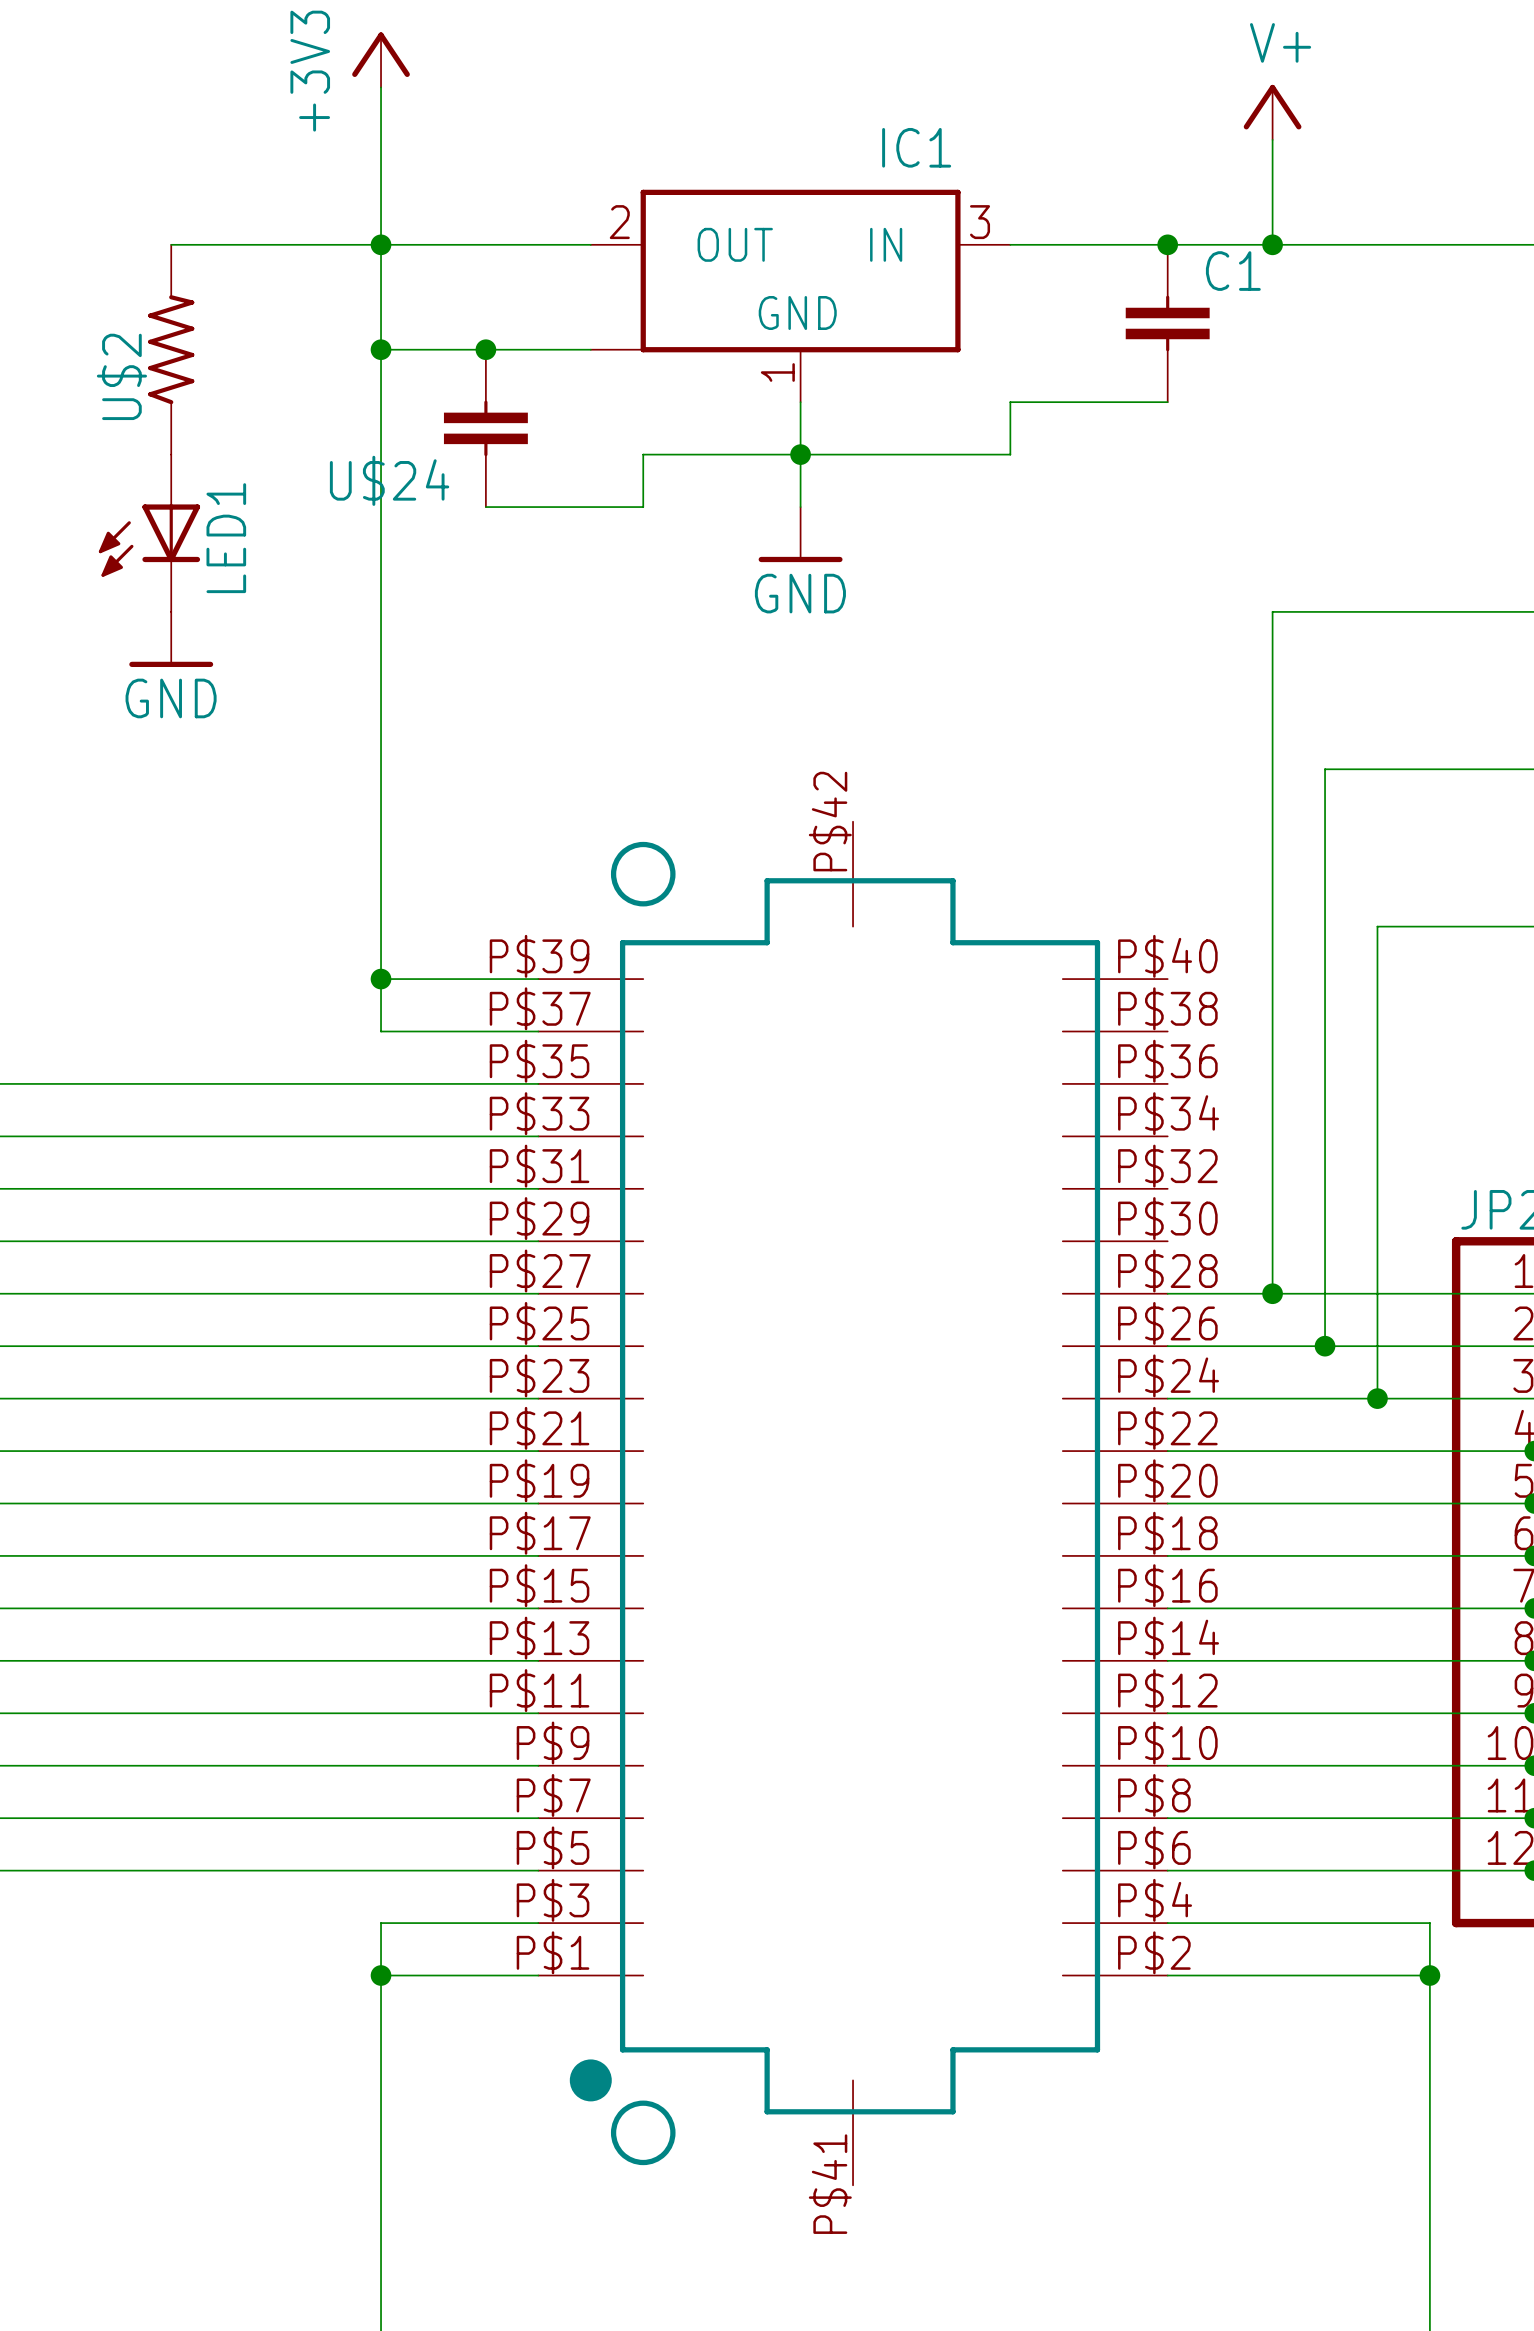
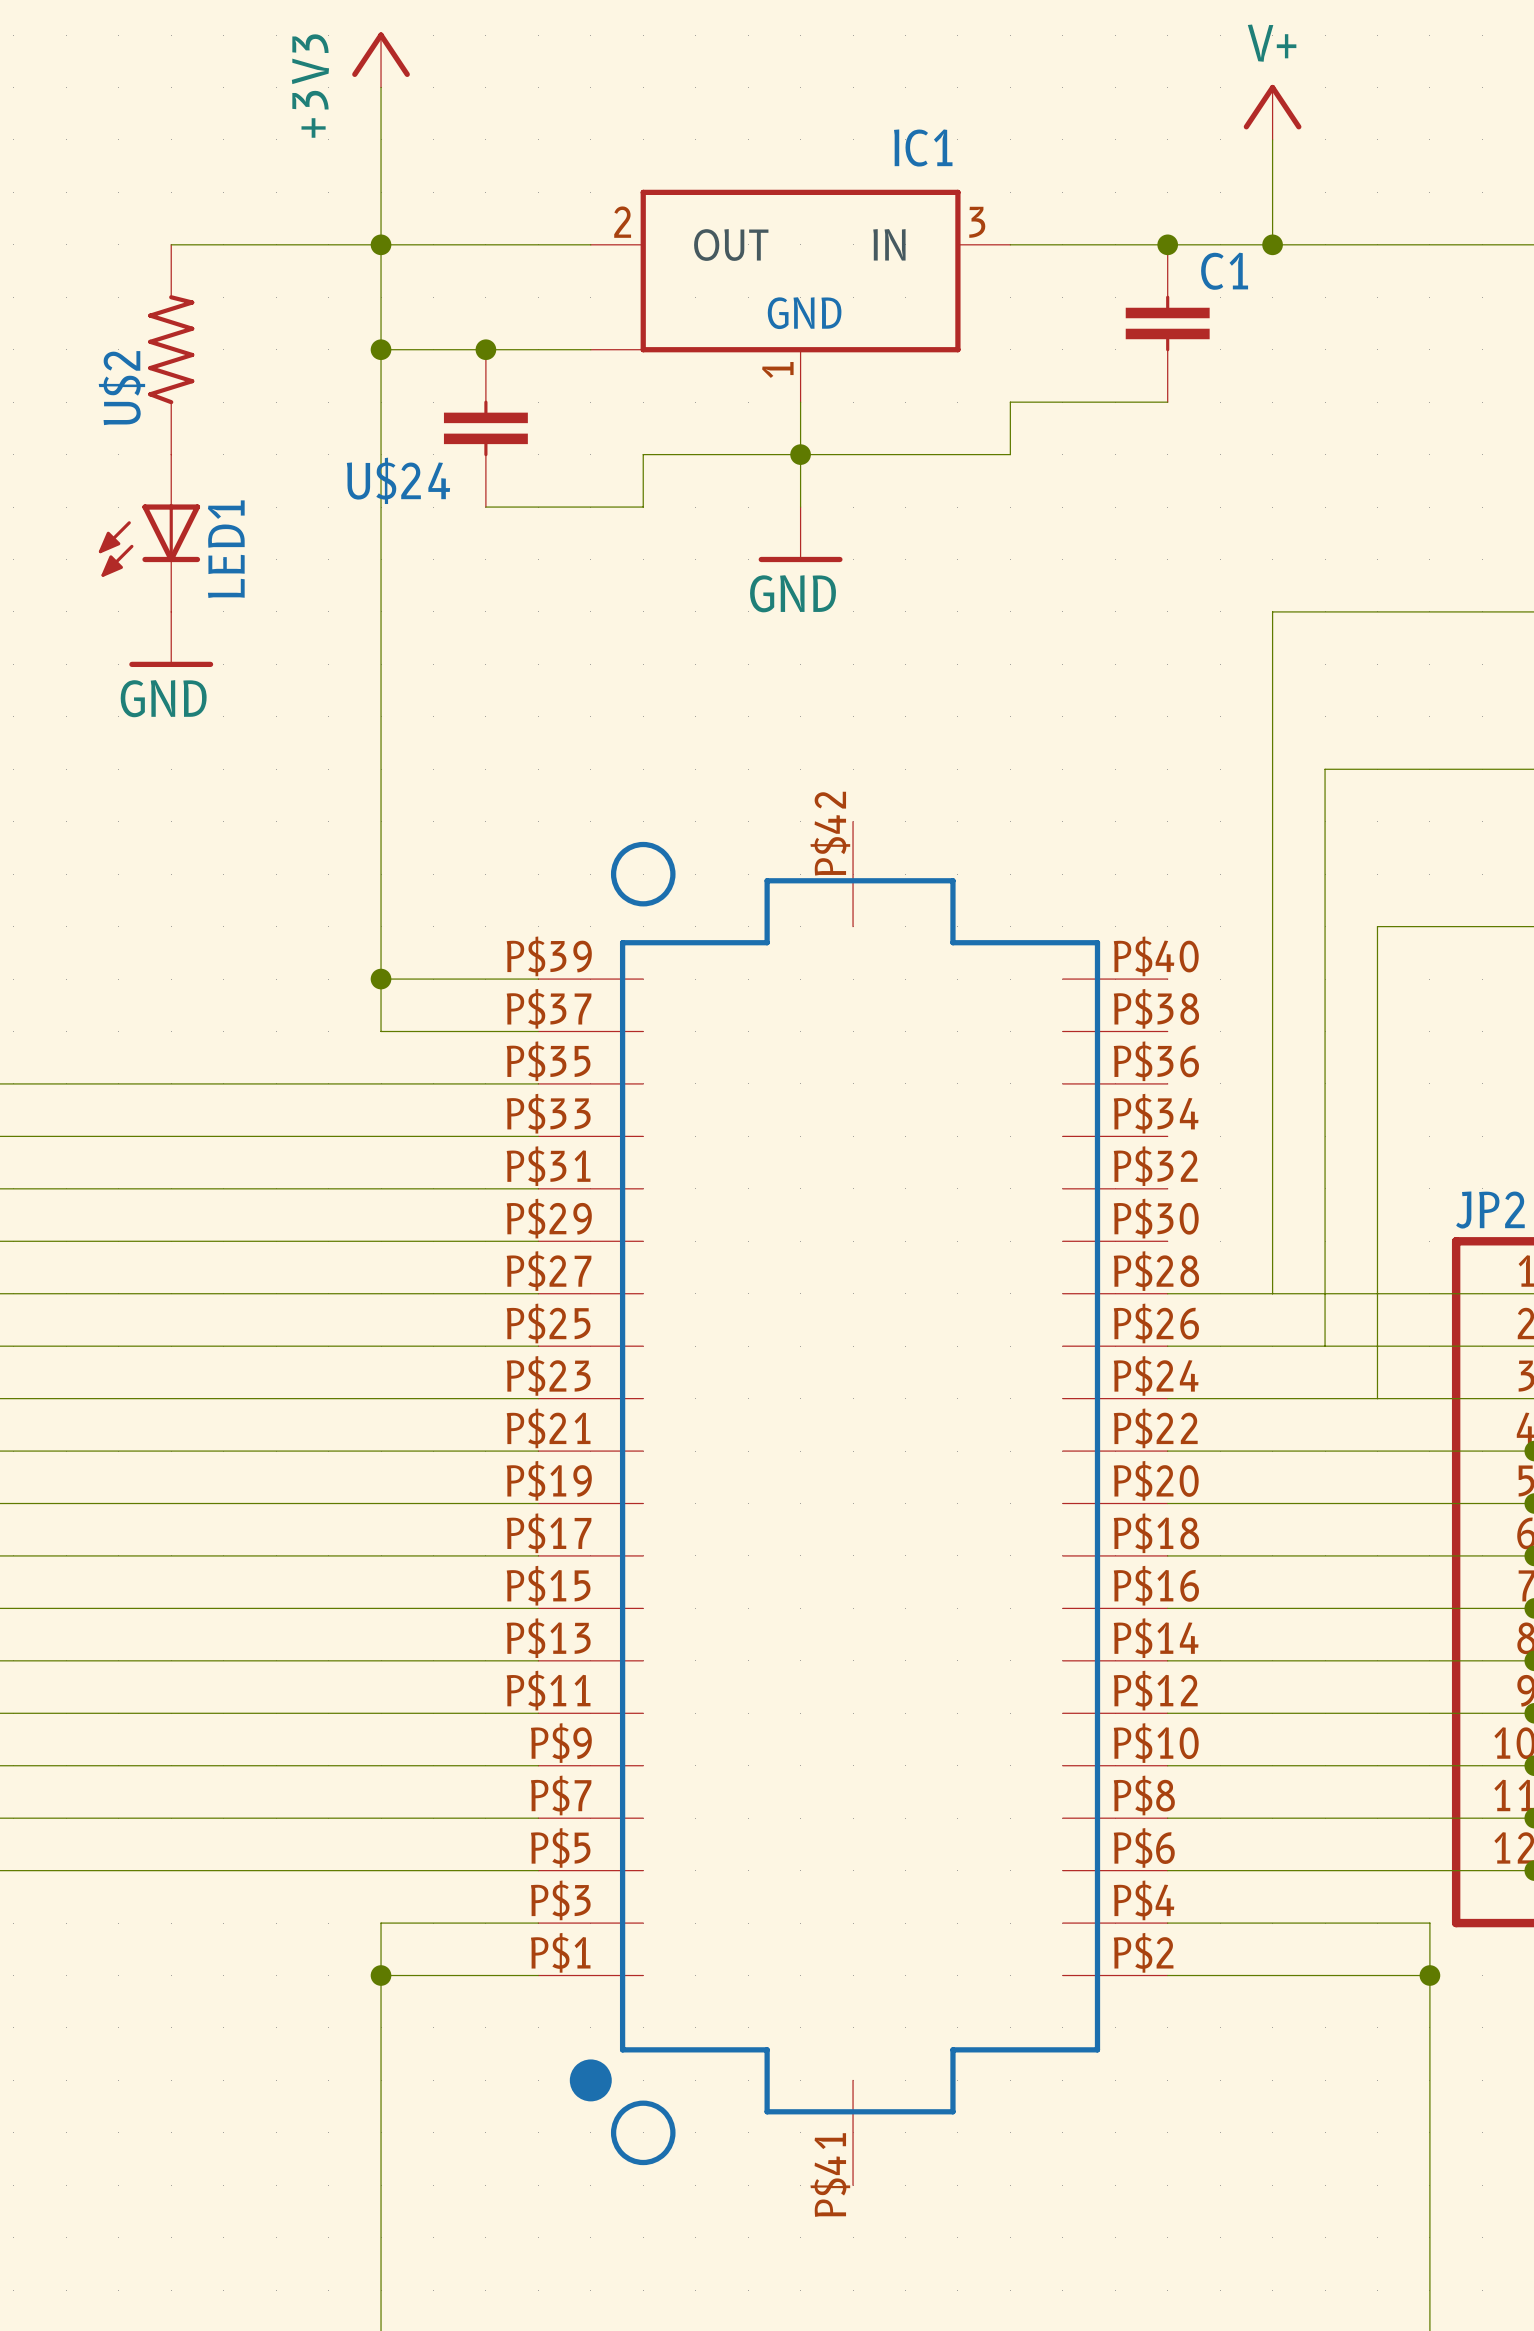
junction: (1272, 1293) -> none
junction: (1325, 1346) -> none
junction: (1377, 1398) -> none

